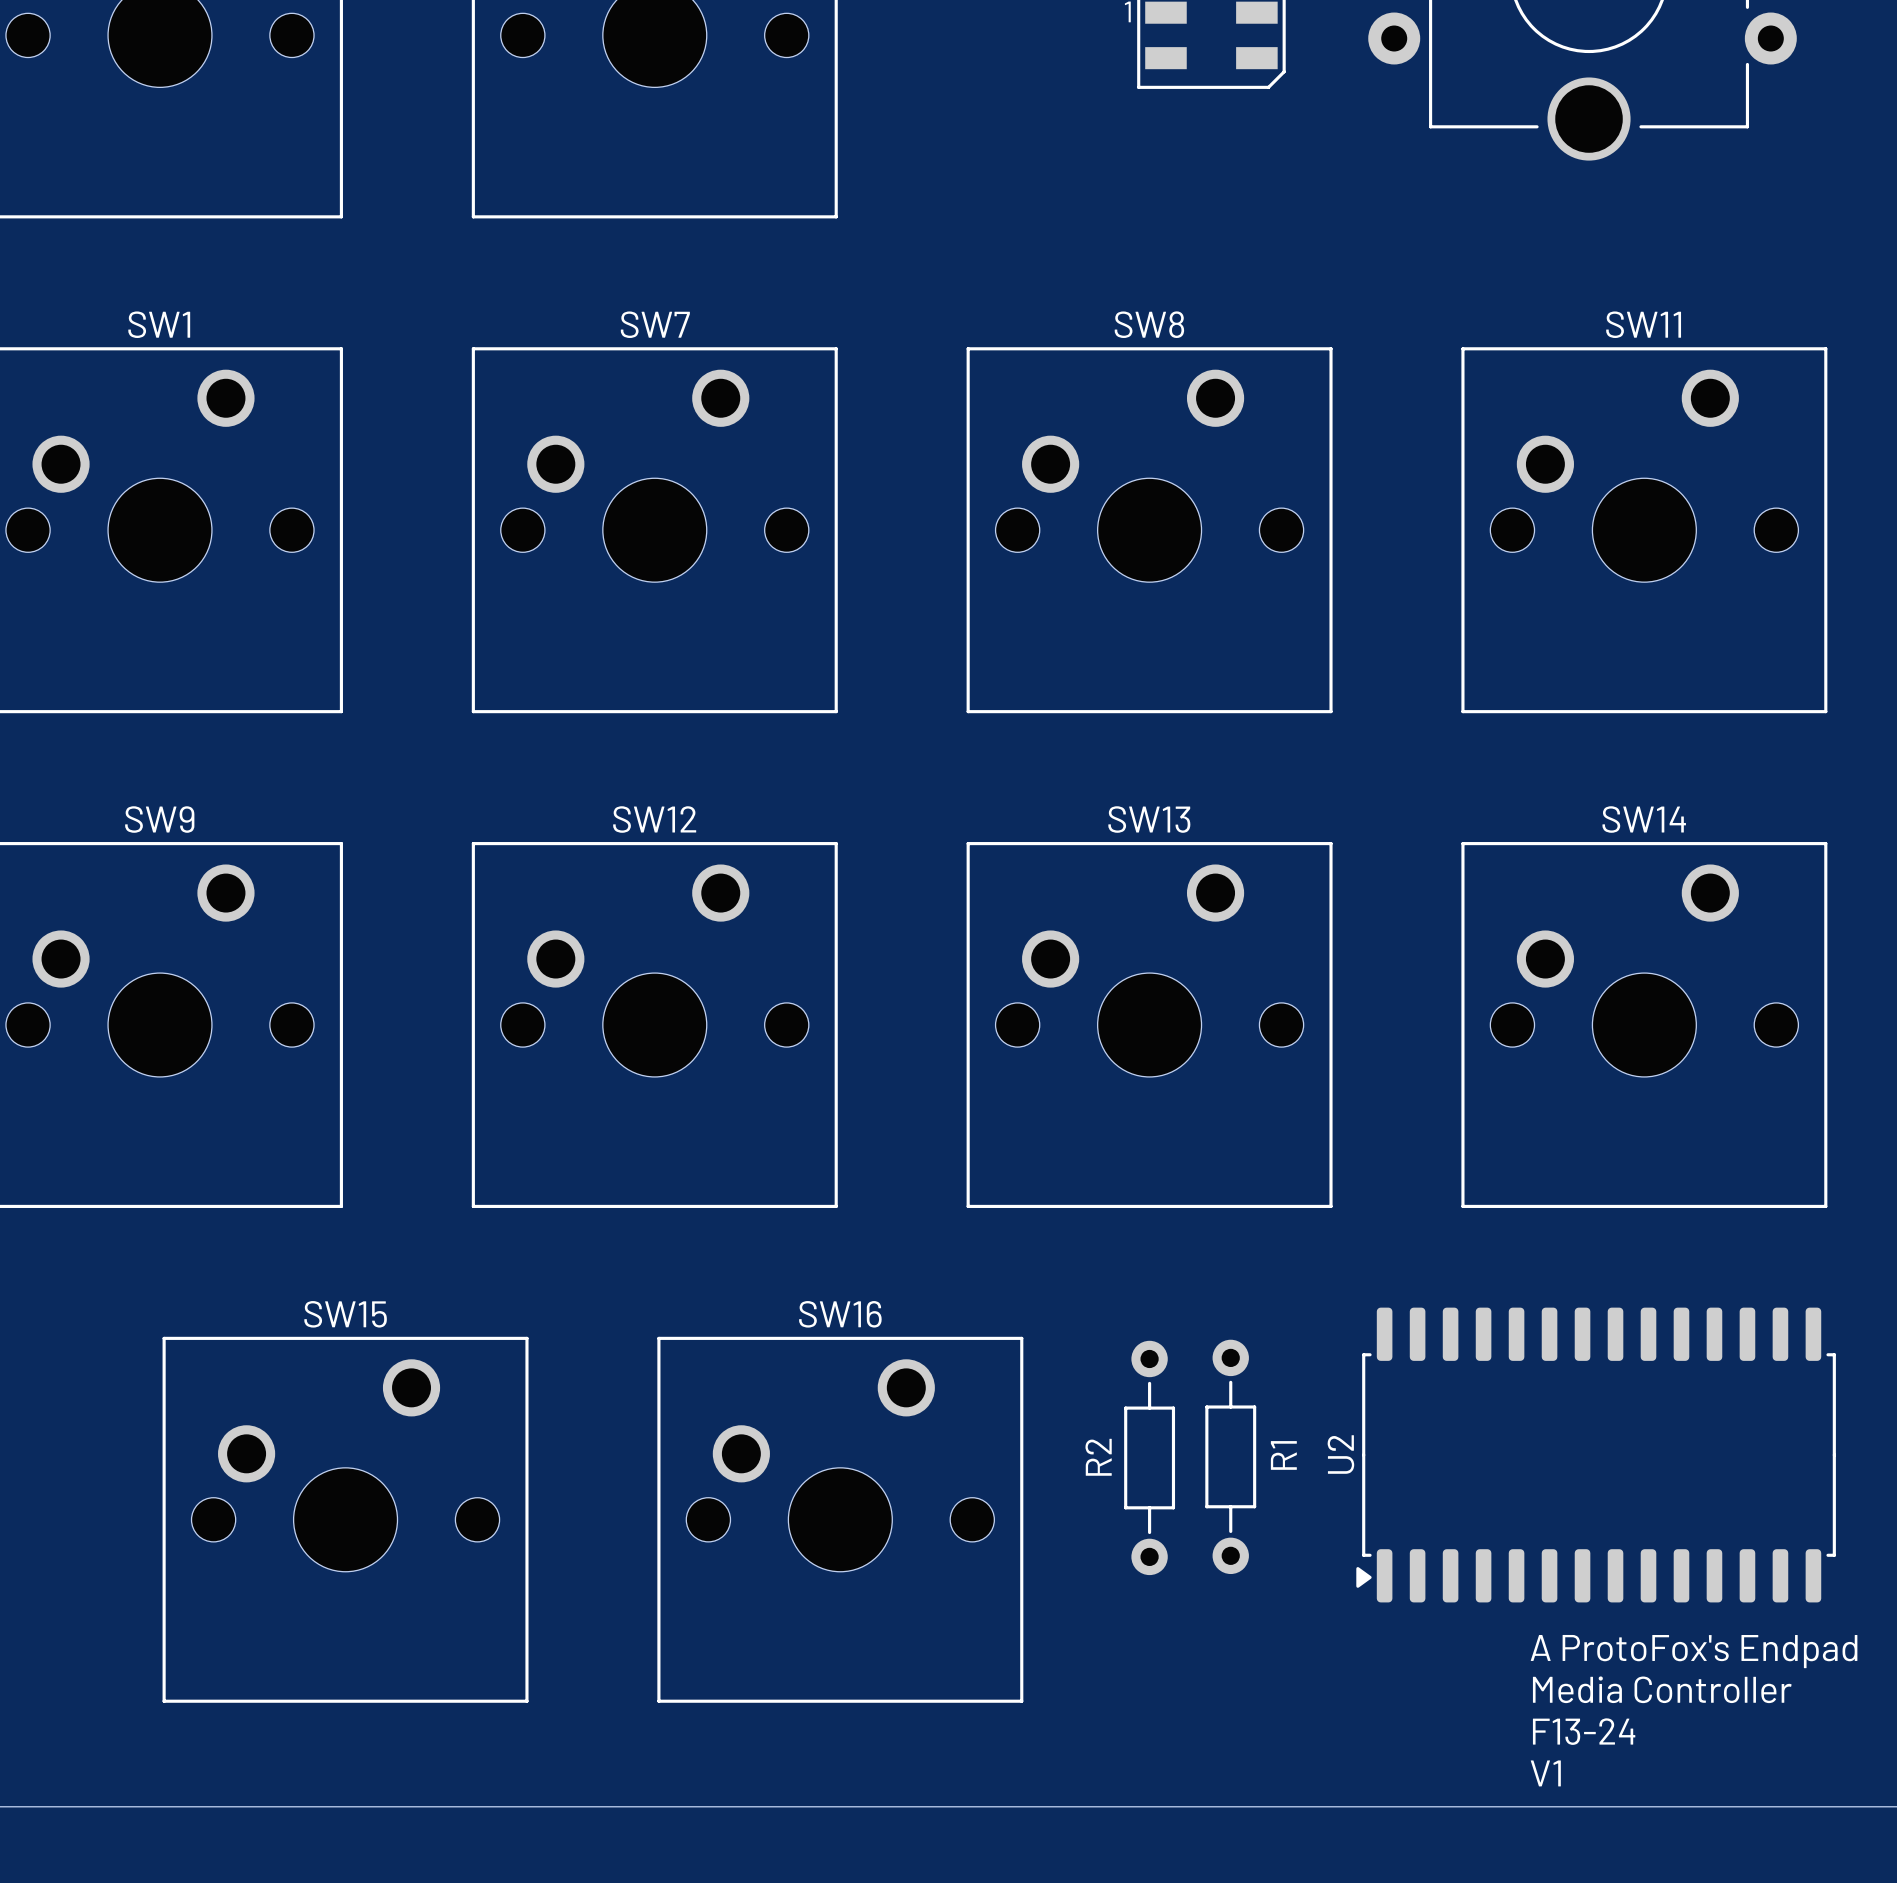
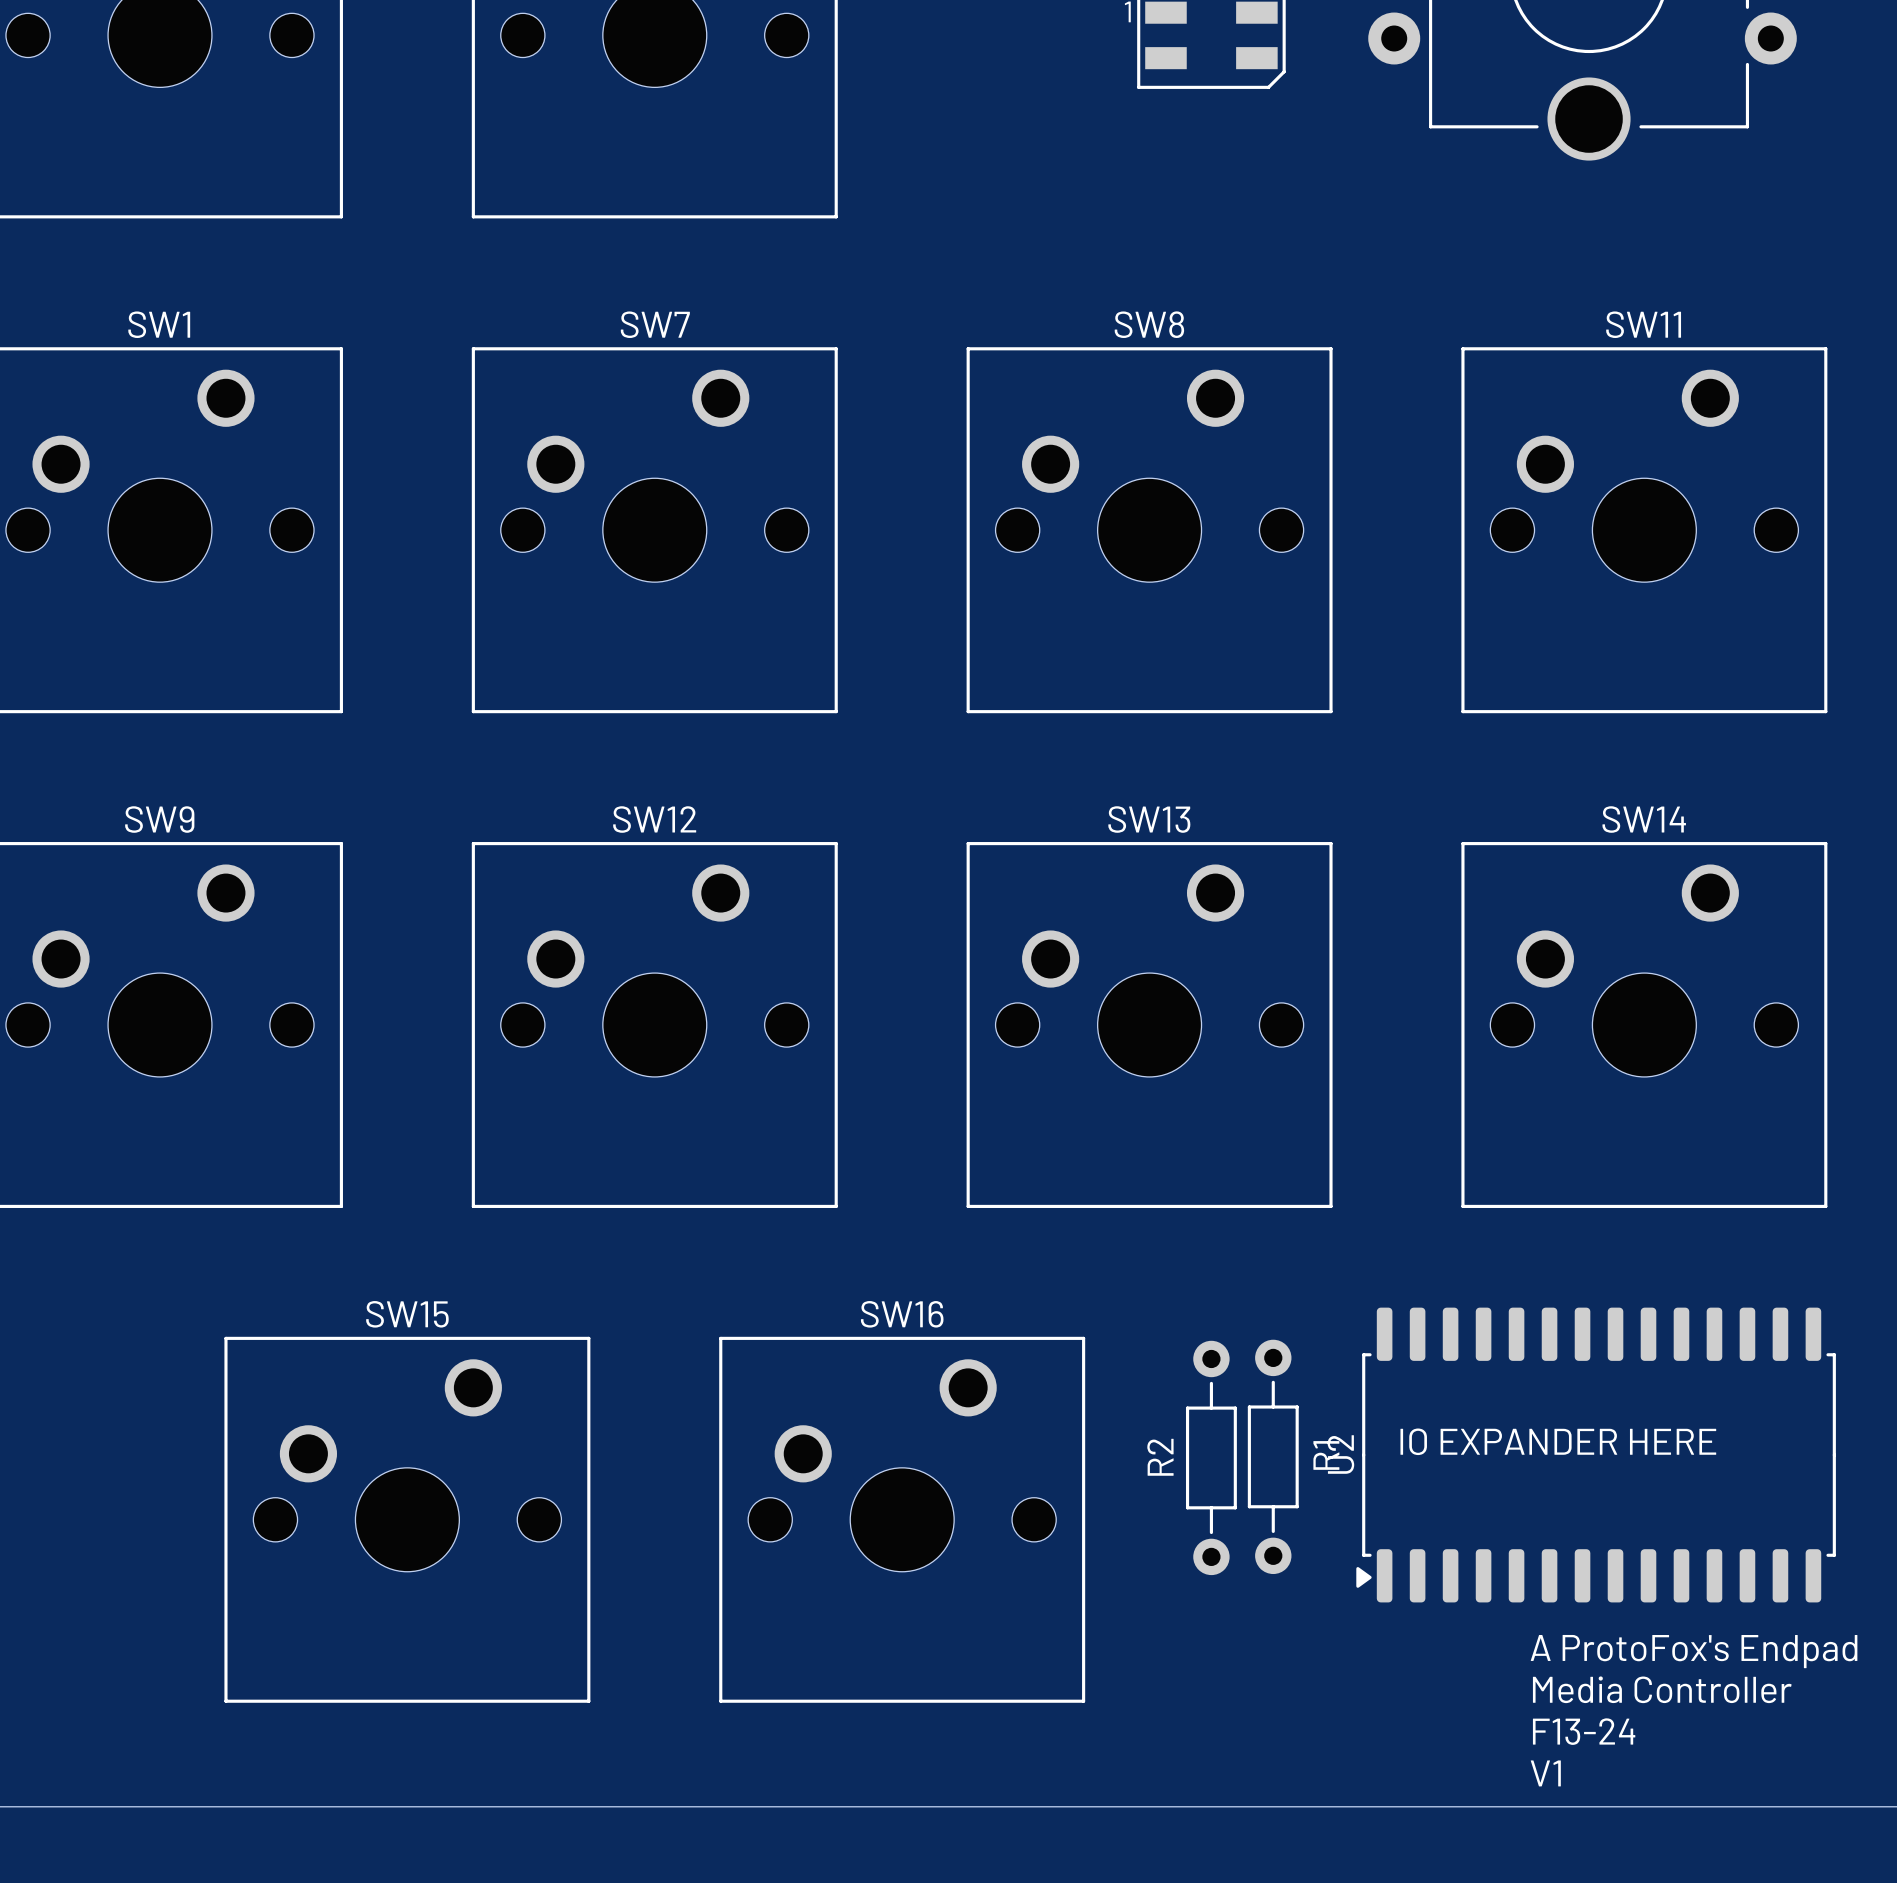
text: none -> IO EXPANDER HERE (1558, 1441)
R1 position: (1230, 1456) -> (1273, 1456)
R2 position: (1149, 1457) -> (1211, 1457)
SW15 position: (345, 1519) -> (407, 1519)
SW16 position: (840, 1519) -> (902, 1519)

